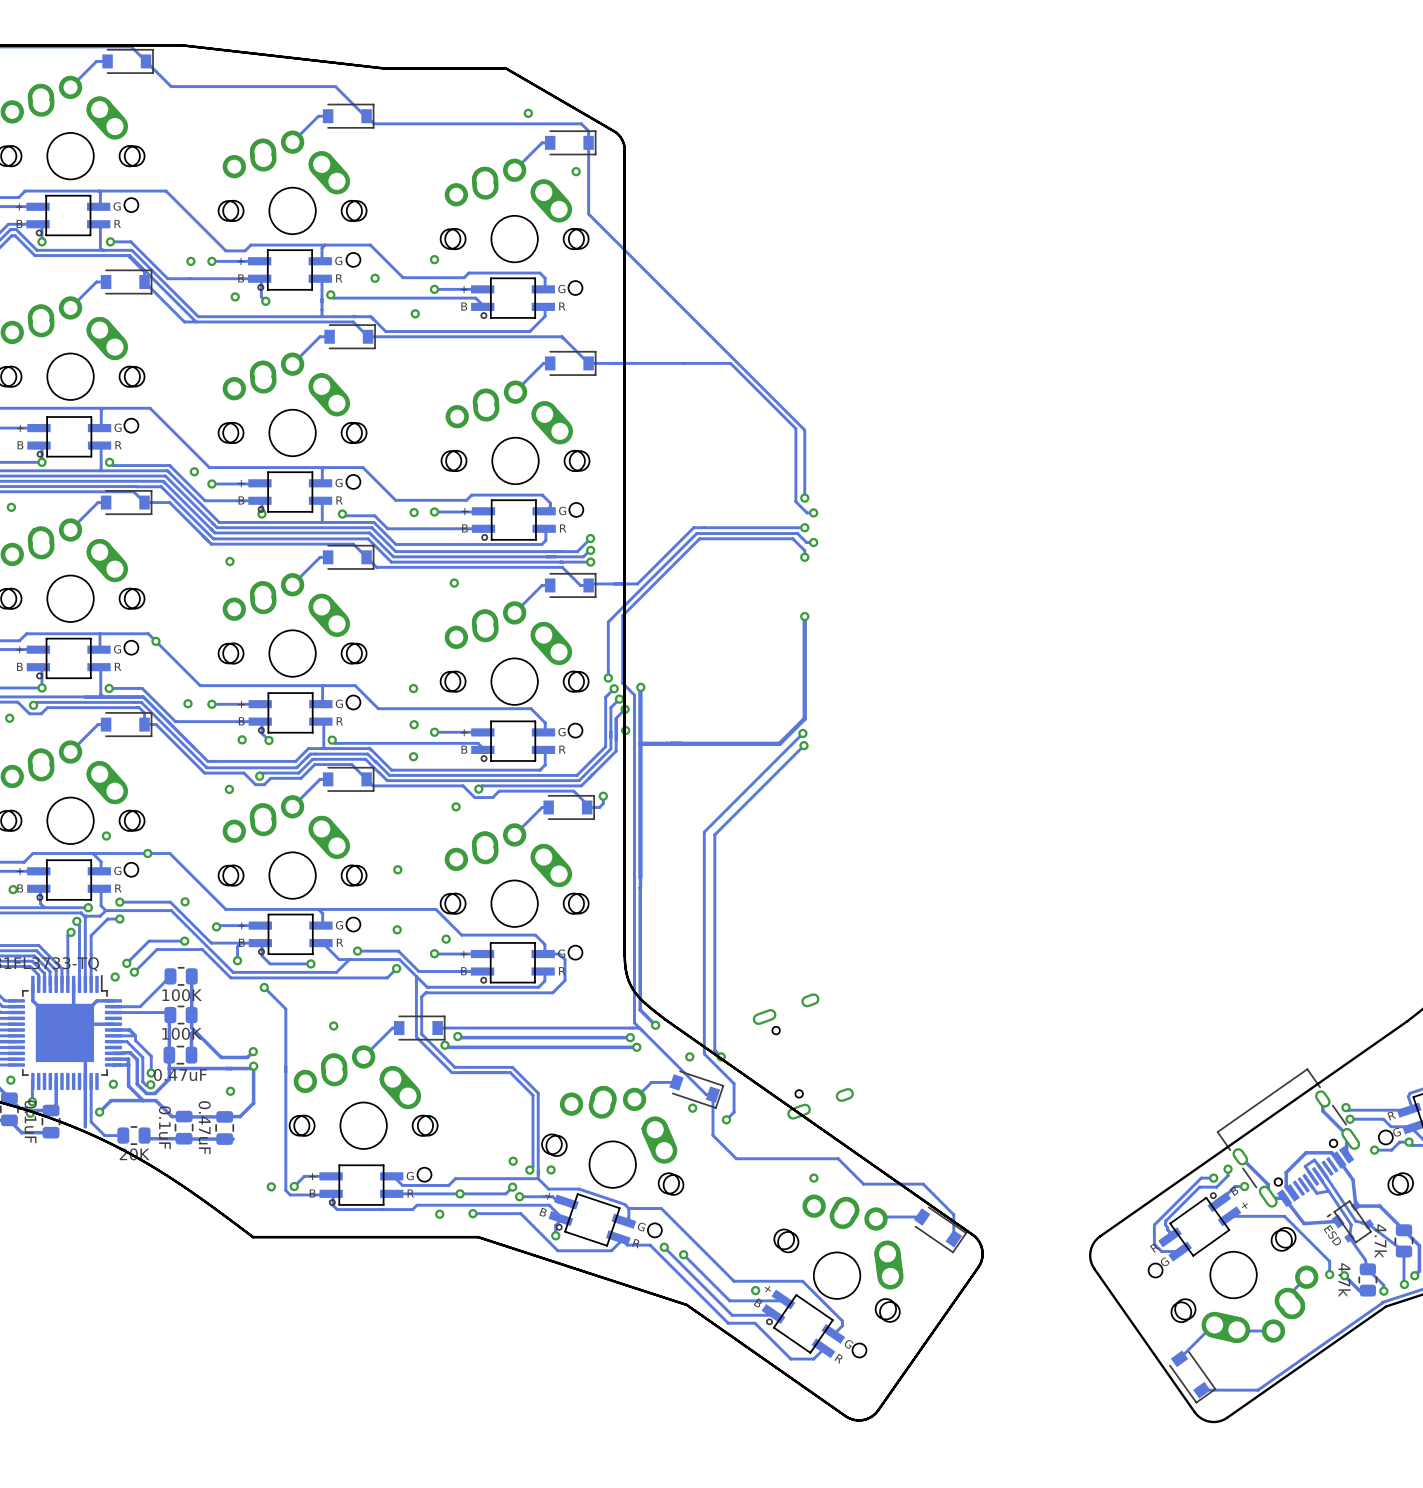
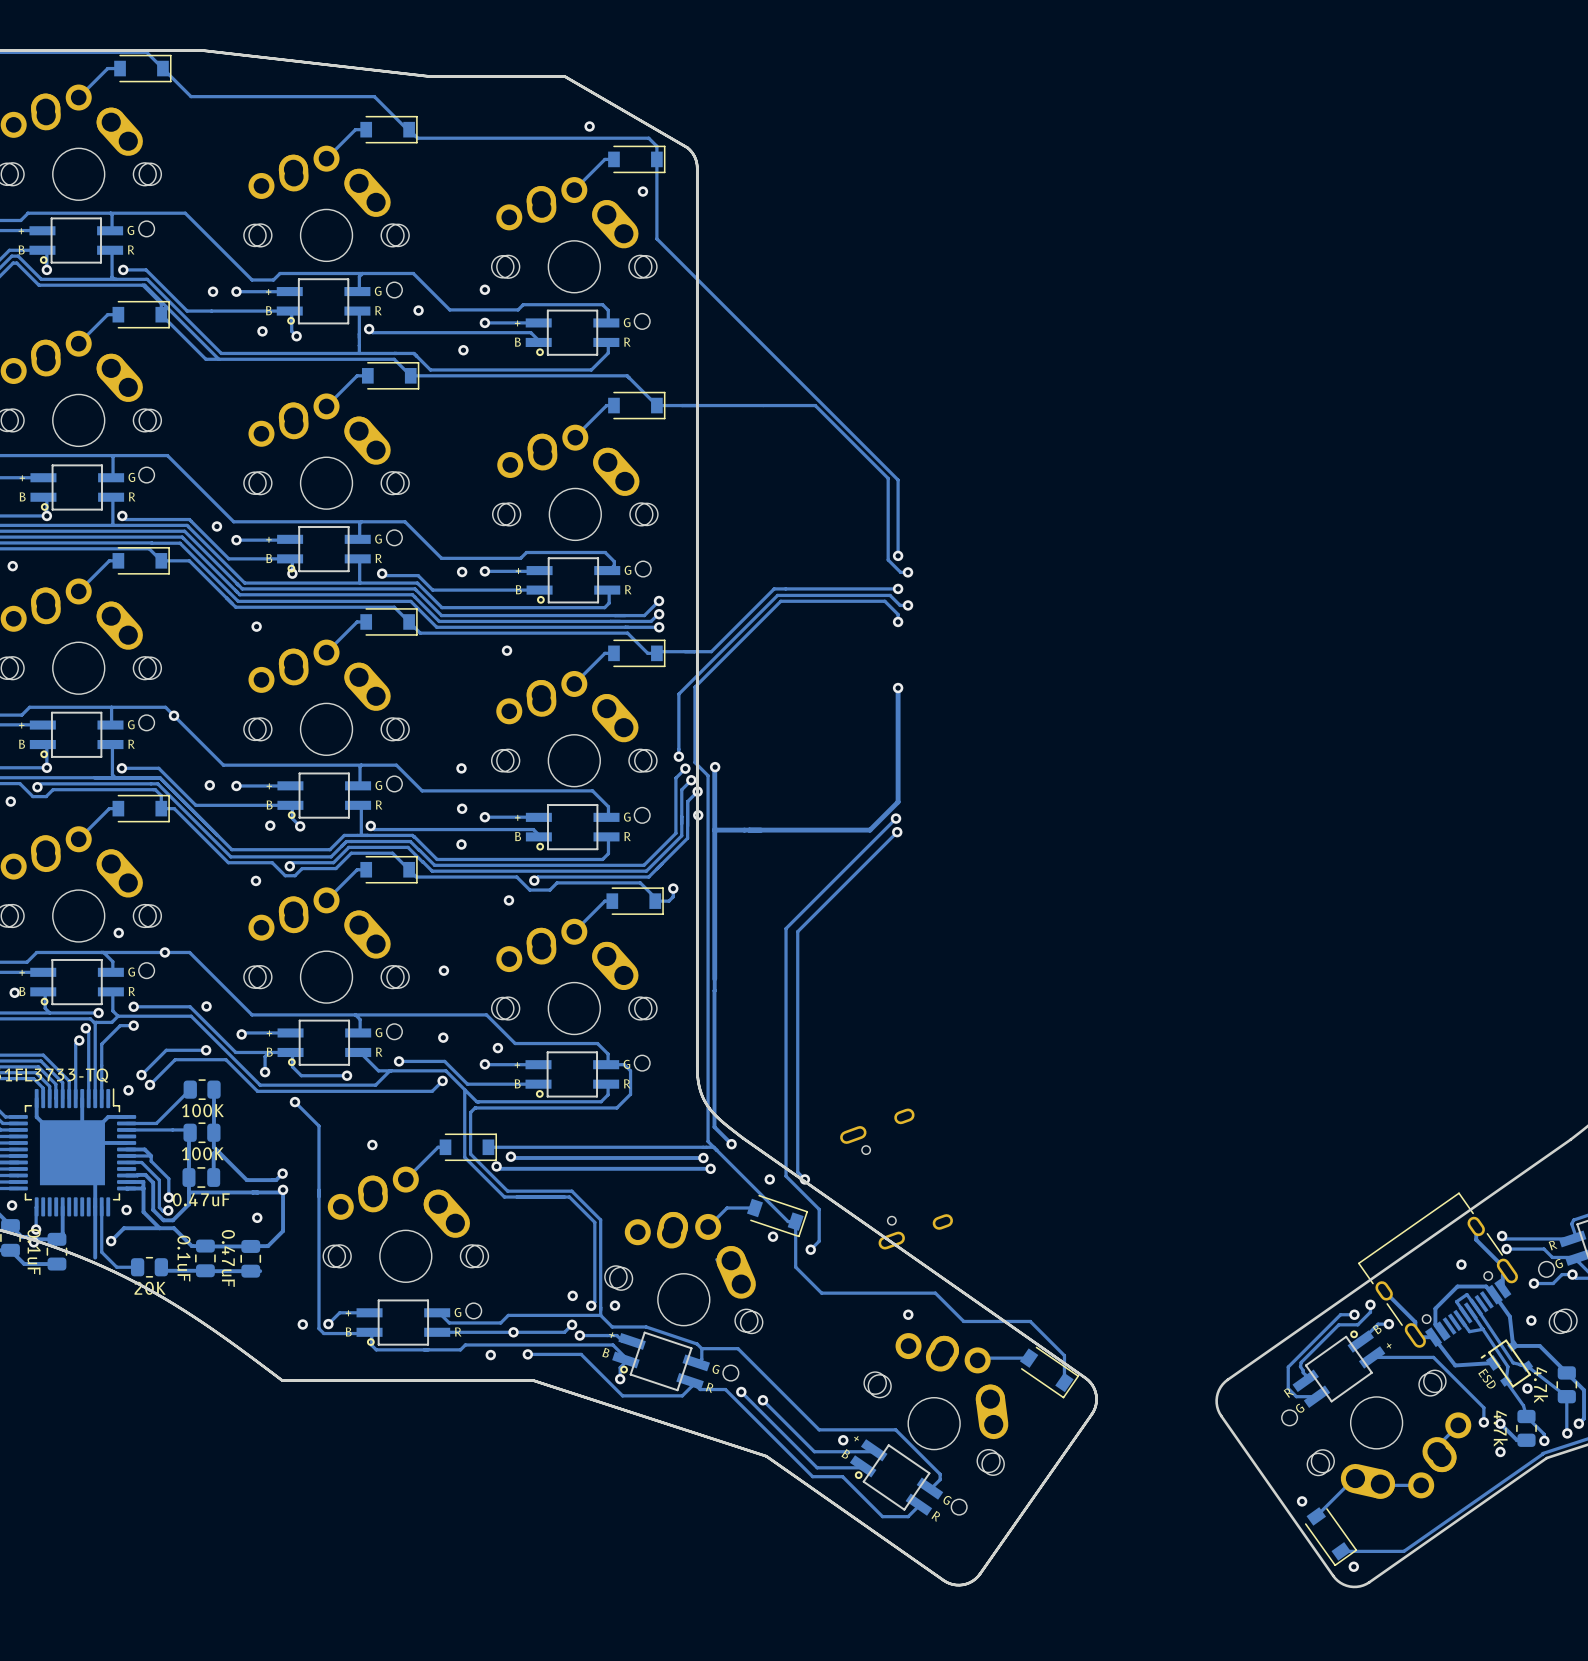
via: none -> (1461, 1264)
via: none -> (1531, 1320)
via: none -> (1527, 1388)
via: none -> (1500, 1451)
via: none -> (1302, 1501)
via: none -> (1353, 1566)

